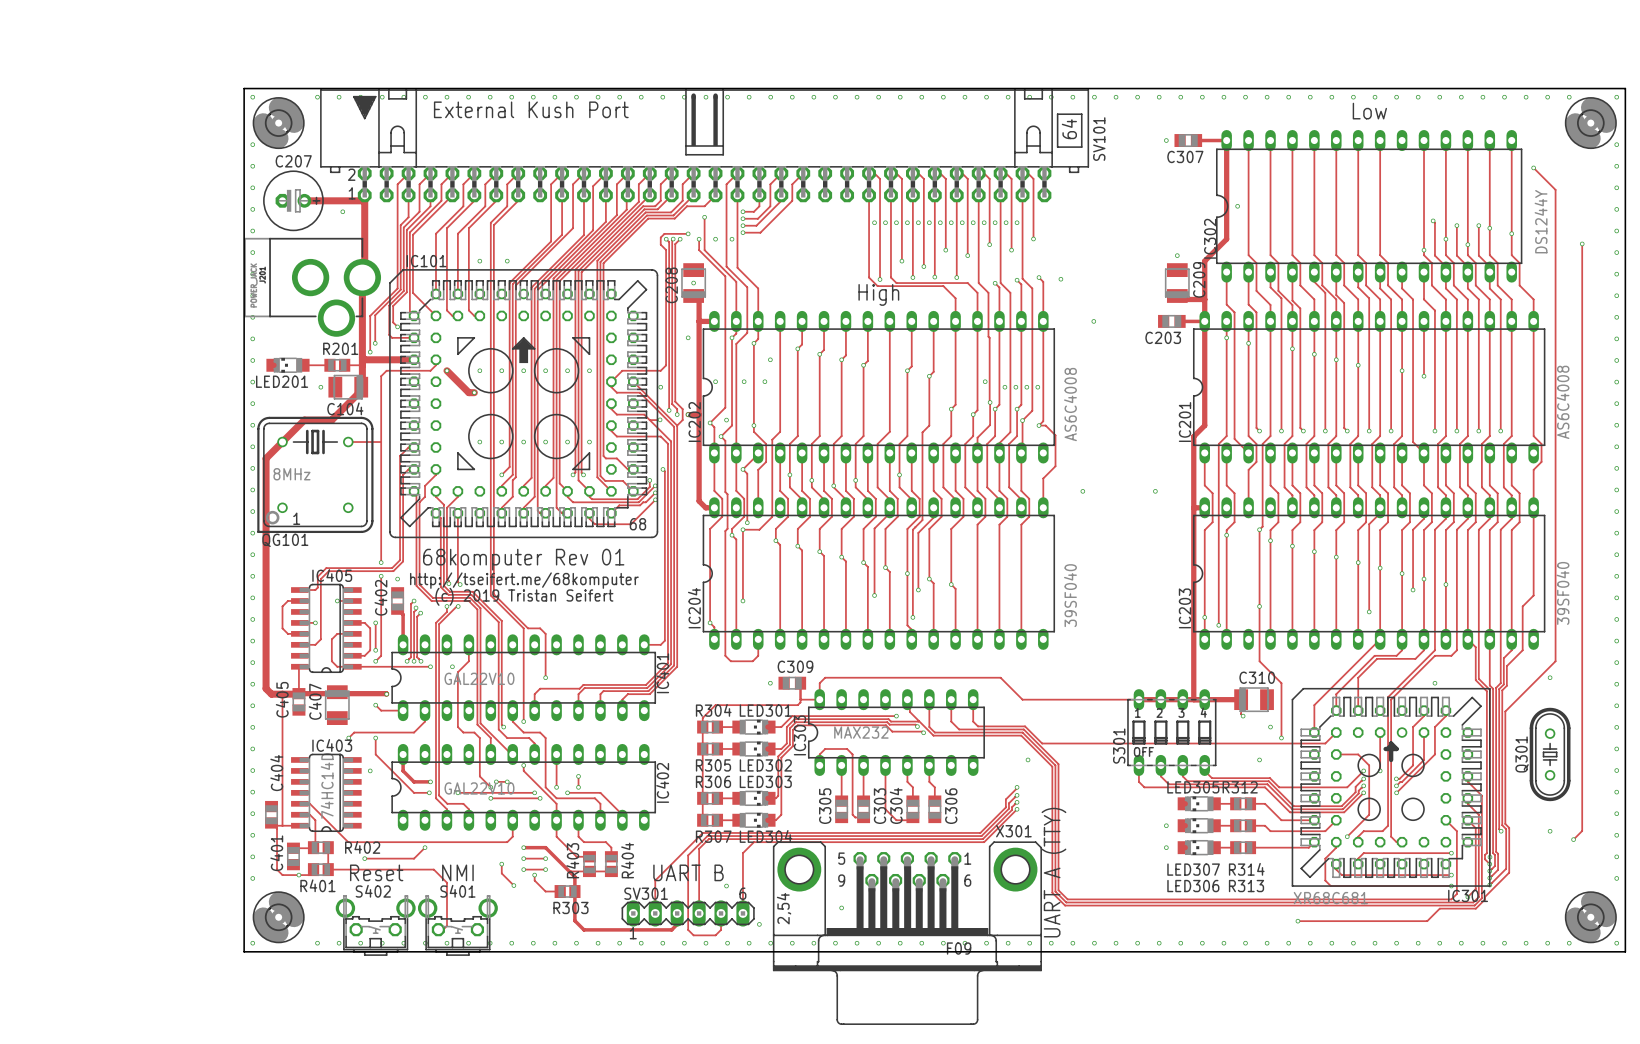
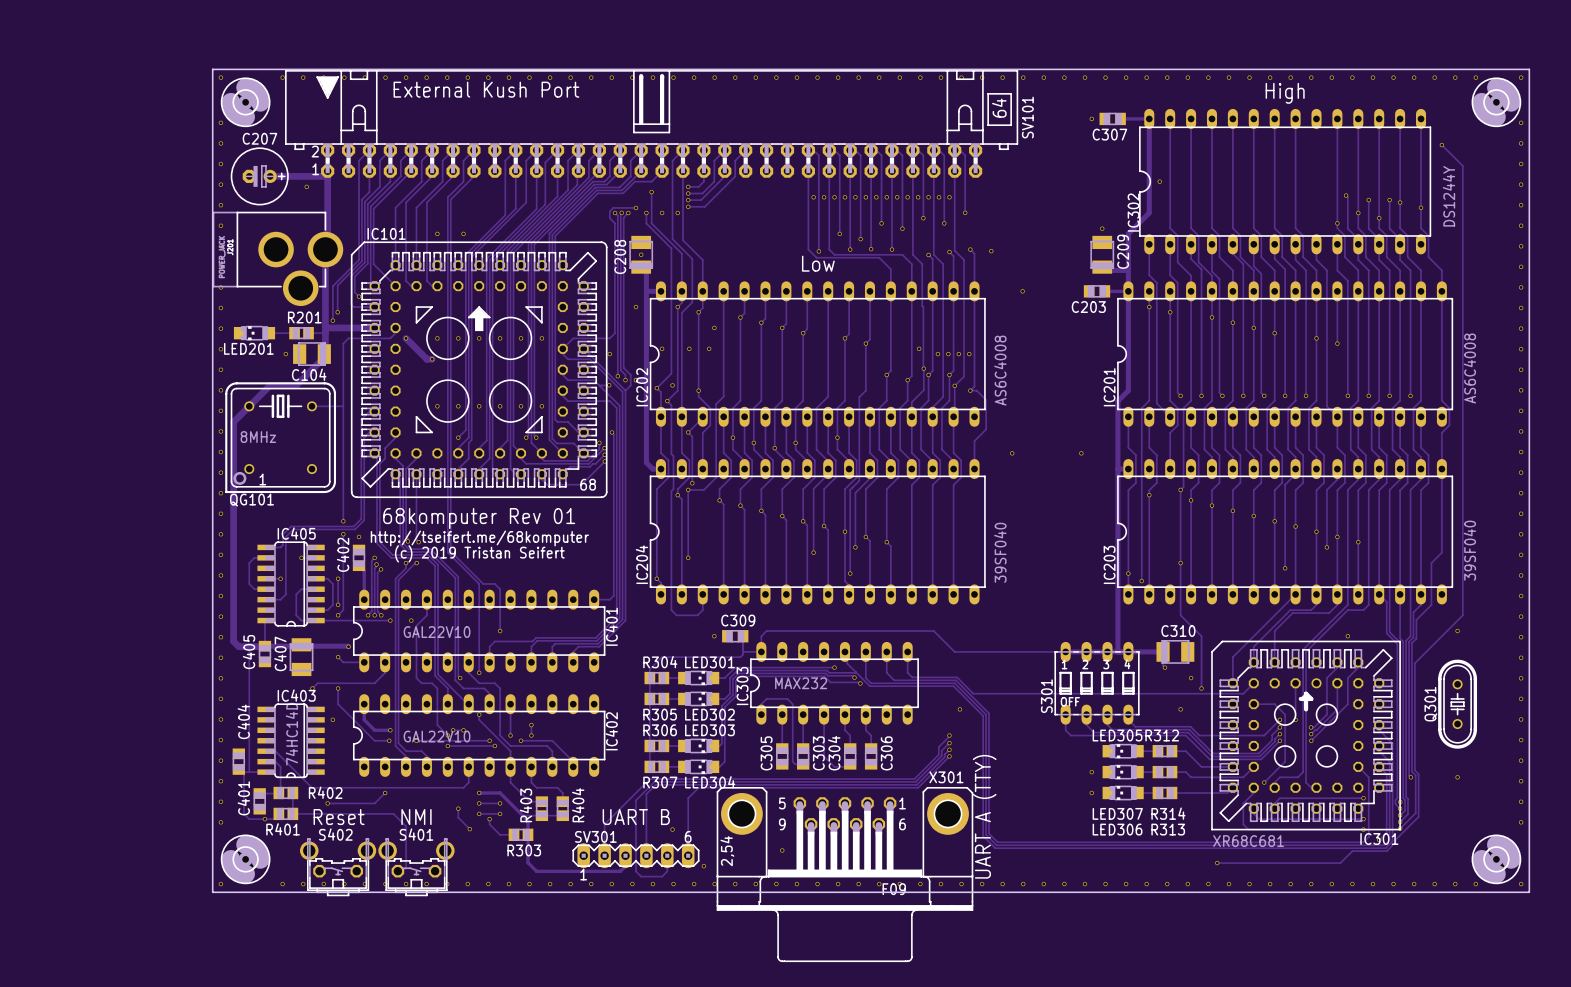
text: Low (1369, 111) -> High (1285, 93)
track: (1582, 243) (1582, 830) (1573, 839) -> none
via: (1582, 243) -> none
text: High (878, 294) -> Low (818, 263)
via: (1573, 839) -> none

